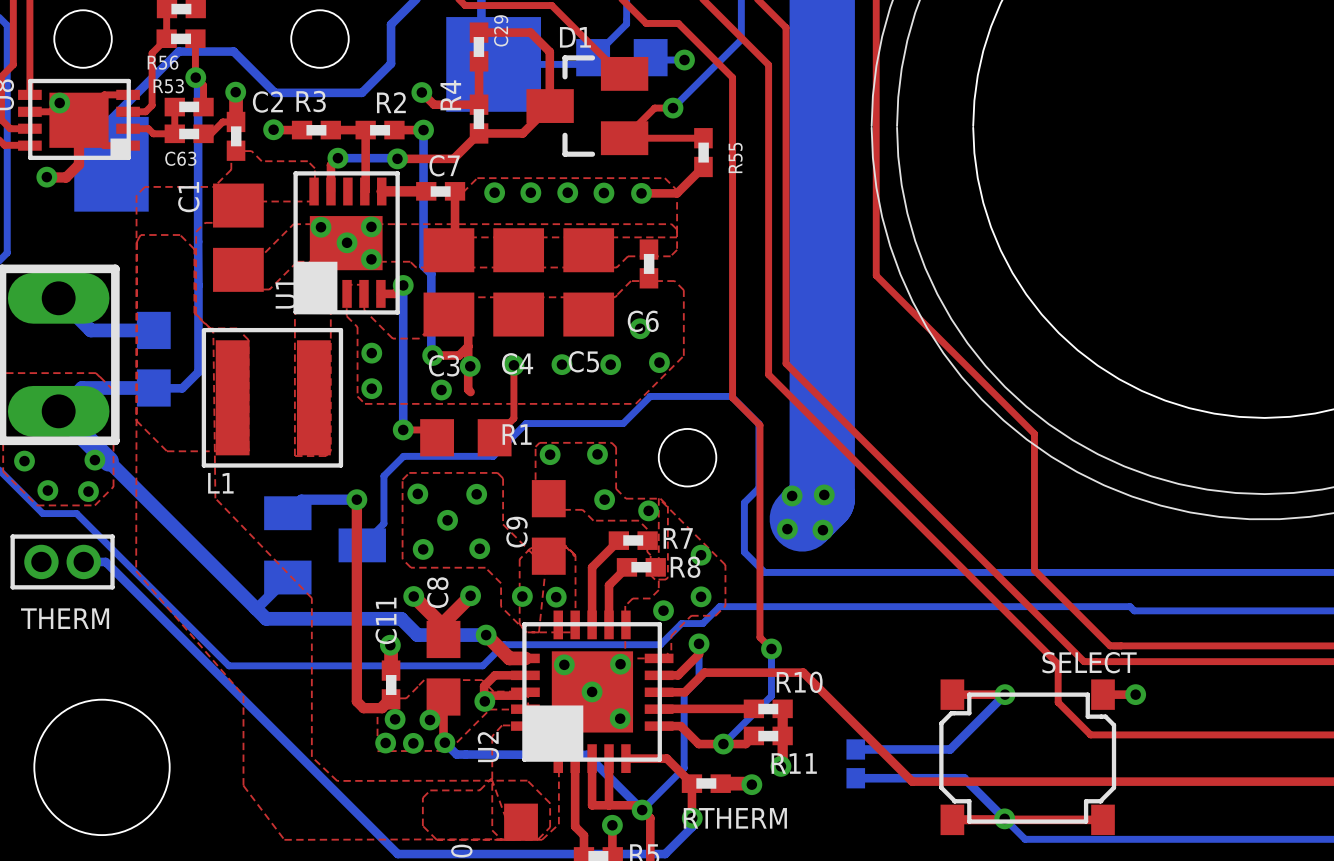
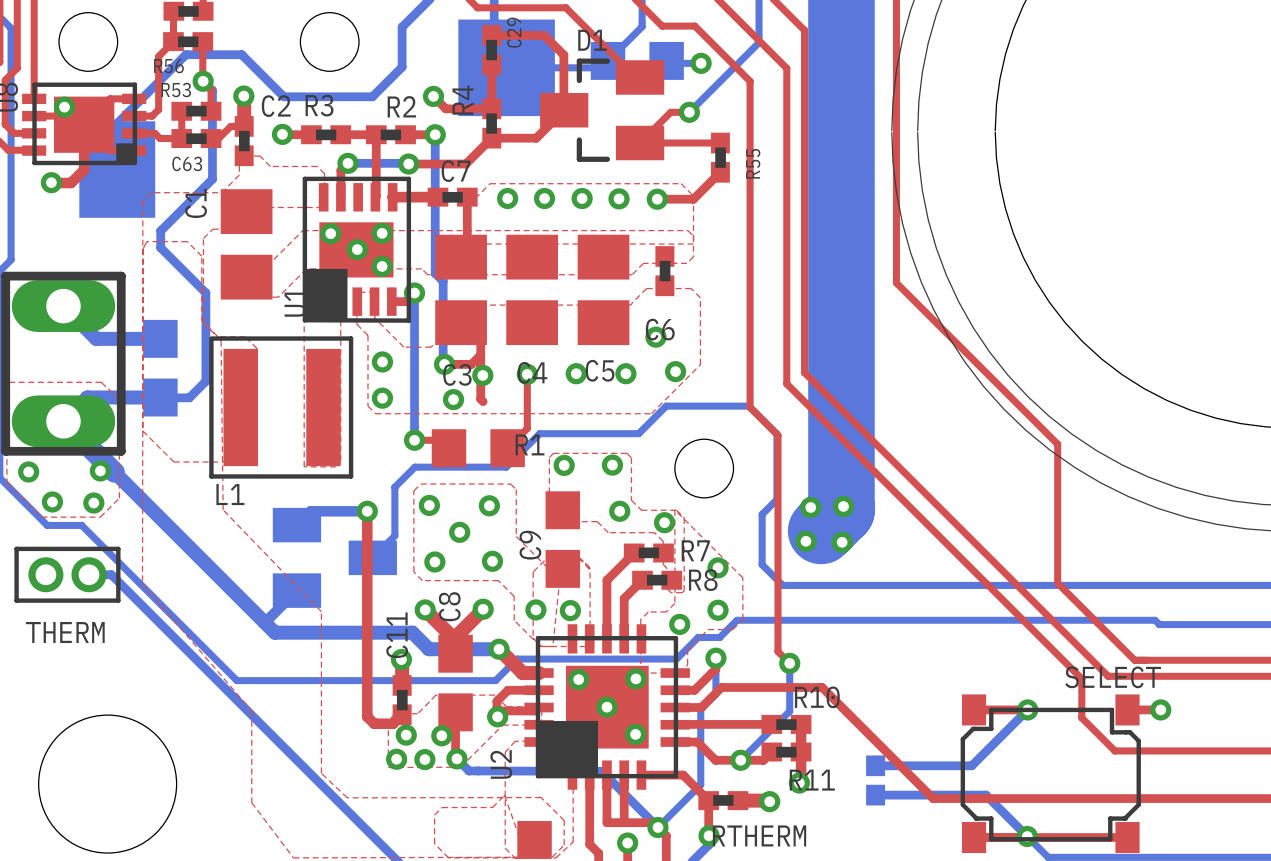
bottom track: (198, 79) (198, 285) -> (205, 83) (212, 90) (212, 179) (160, 230) (160, 247) (205, 293)

